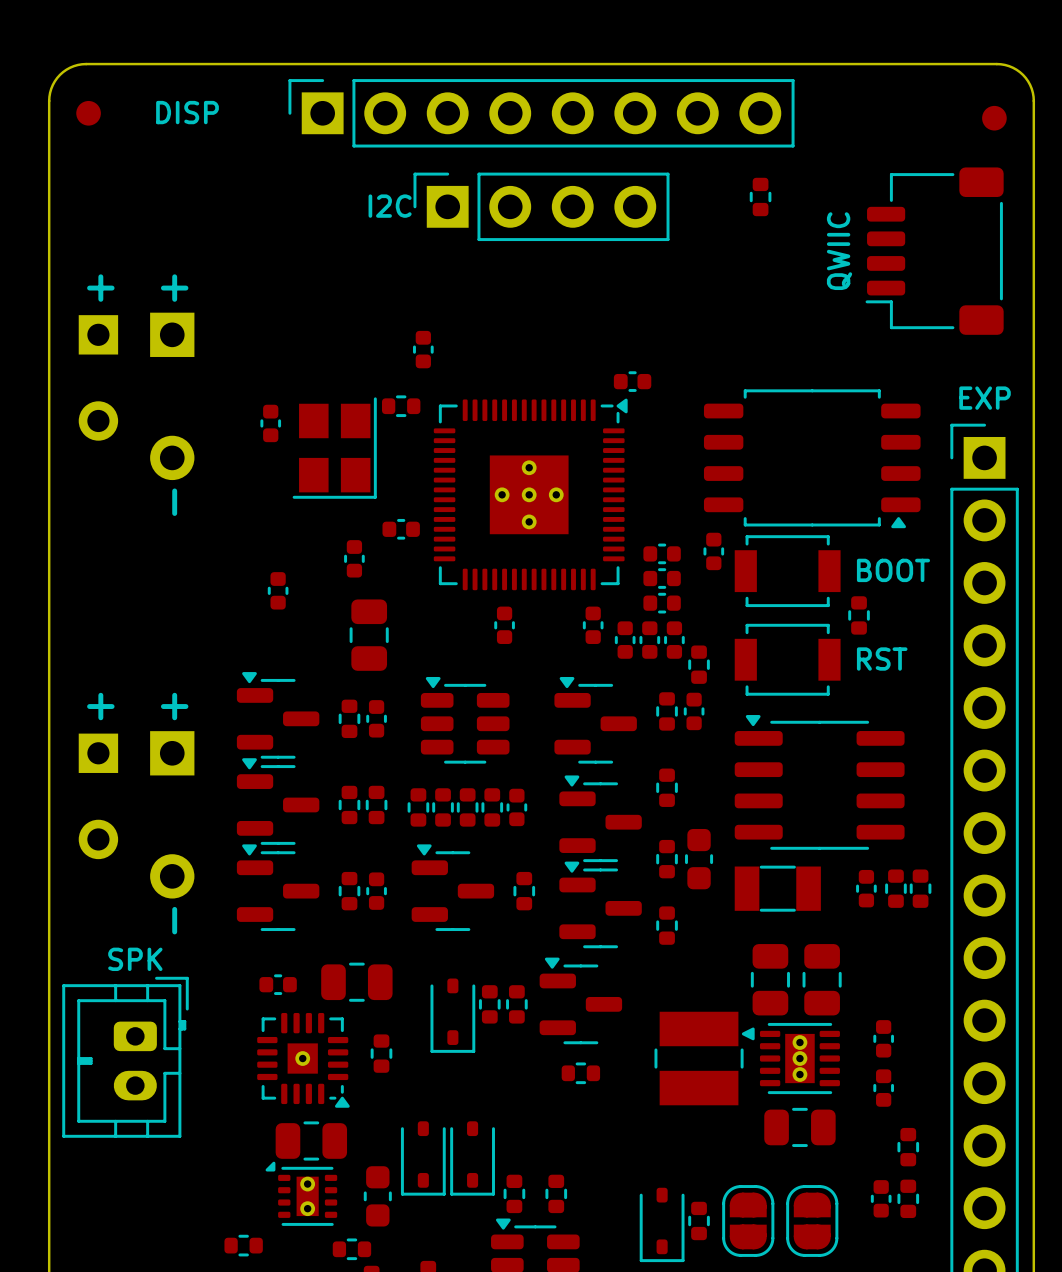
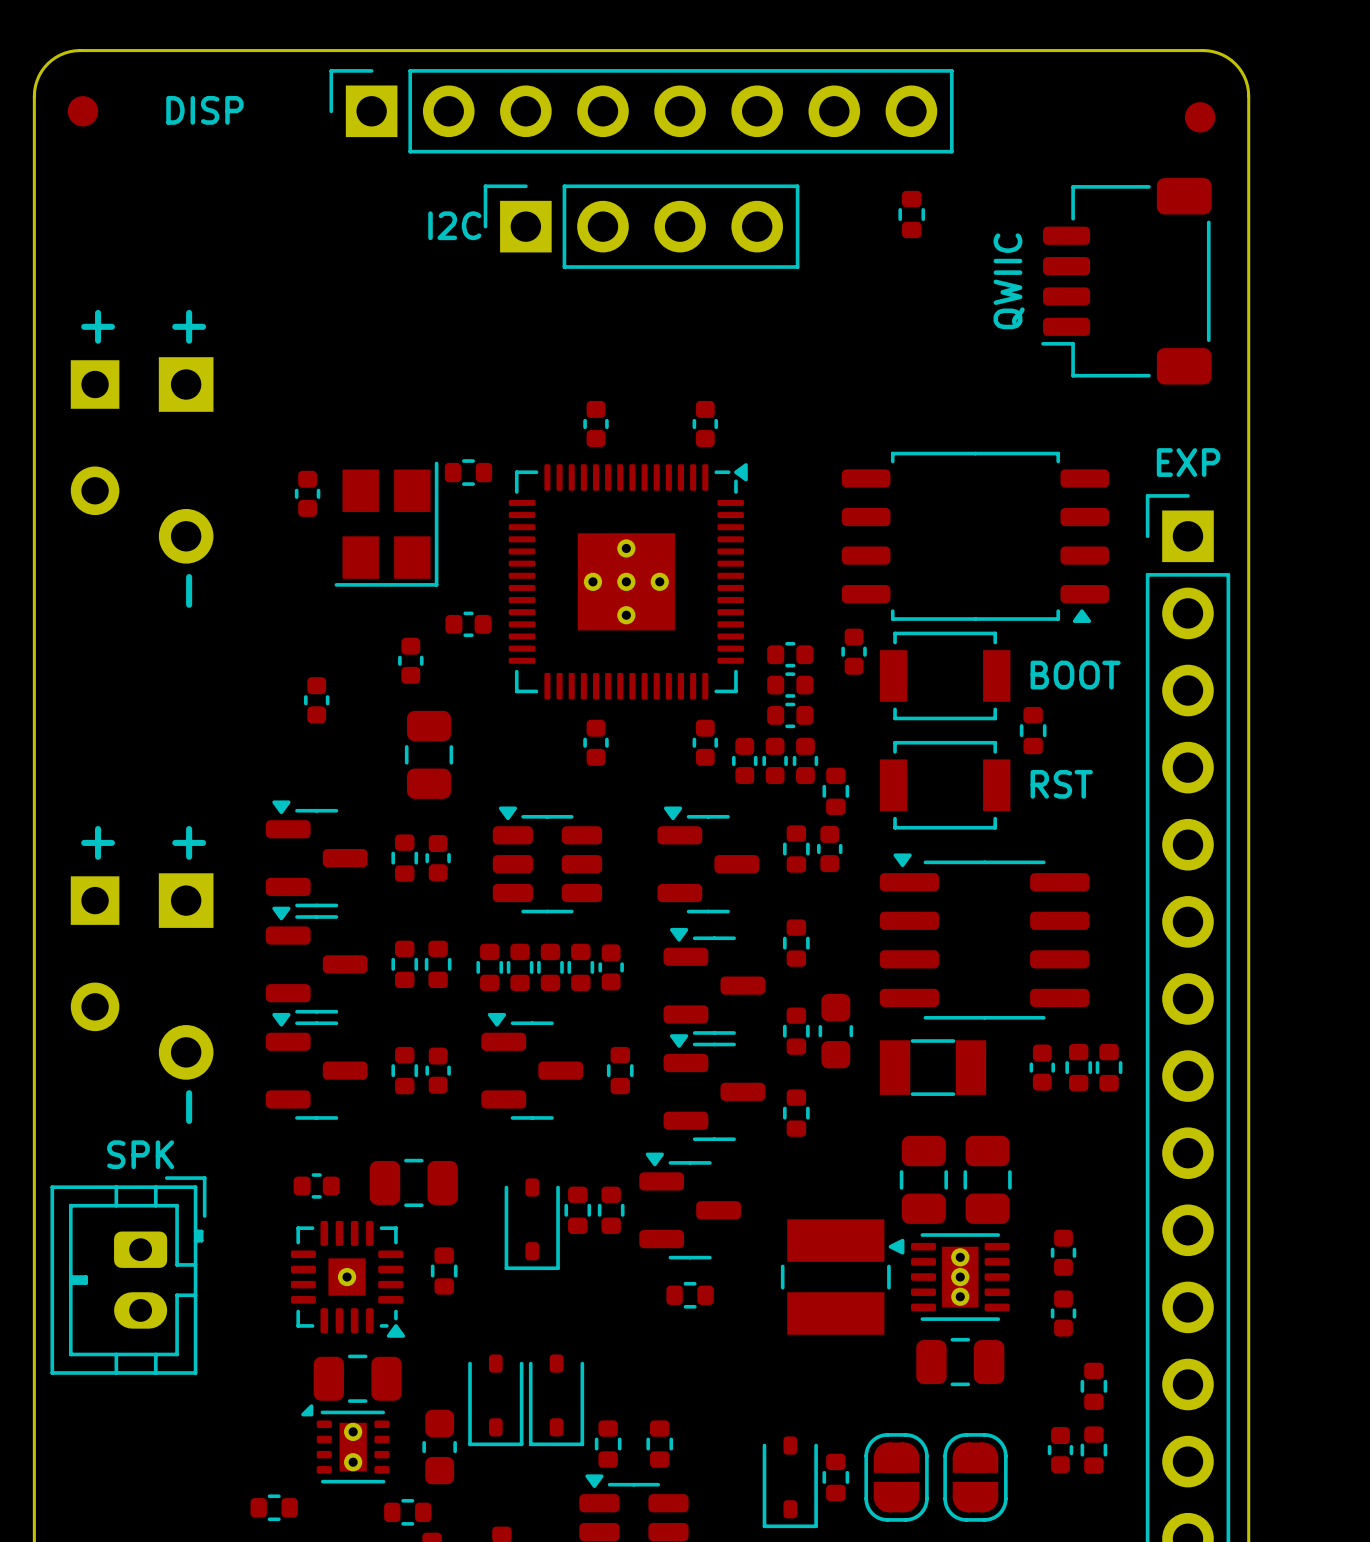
part: (423, 349) -> none
part: none -> (595, 423)
part rotation: 0° (632, 381) -> 90° clockwise (705, 423)
part position: (632, 381) -> (705, 423)

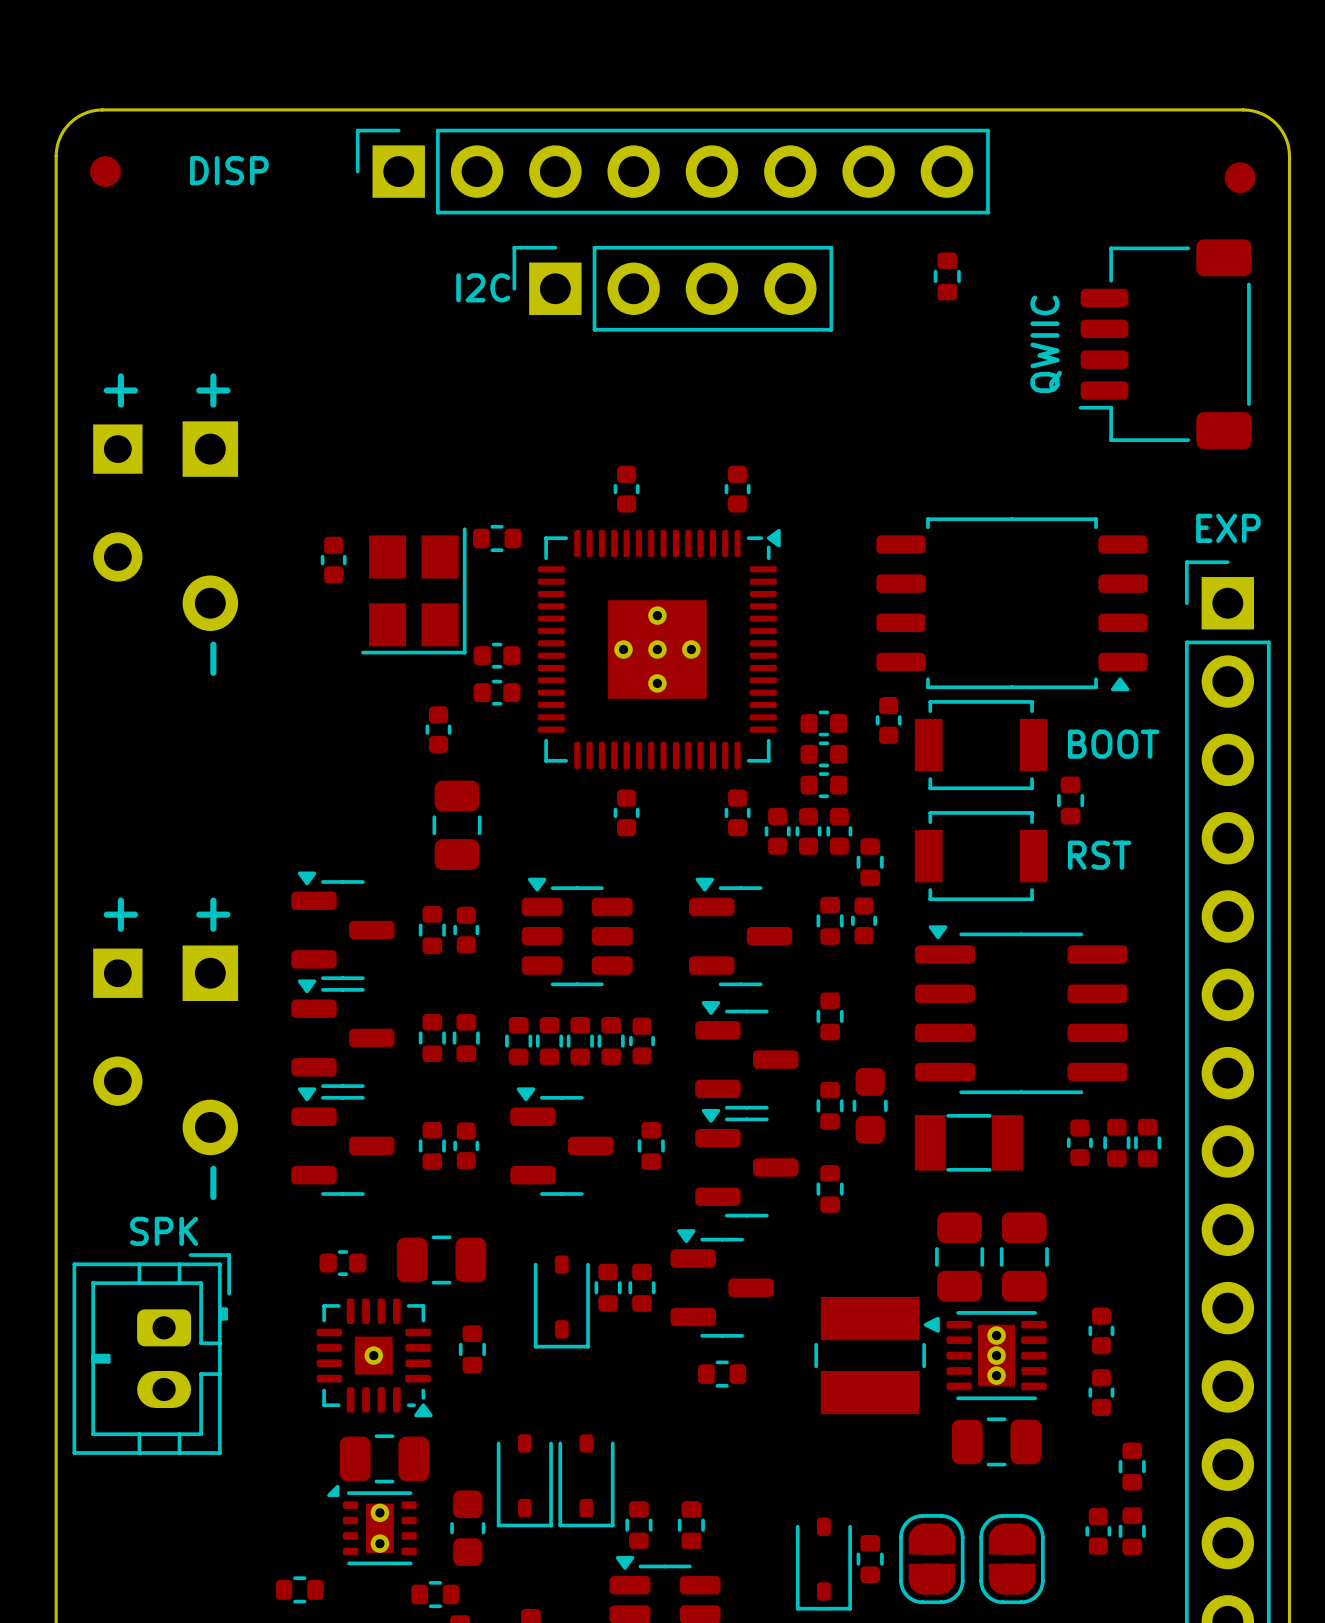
part rotation: 0° (316, 700) -> 90° clockwise (497, 655)
part position: (316, 700) -> (497, 655)

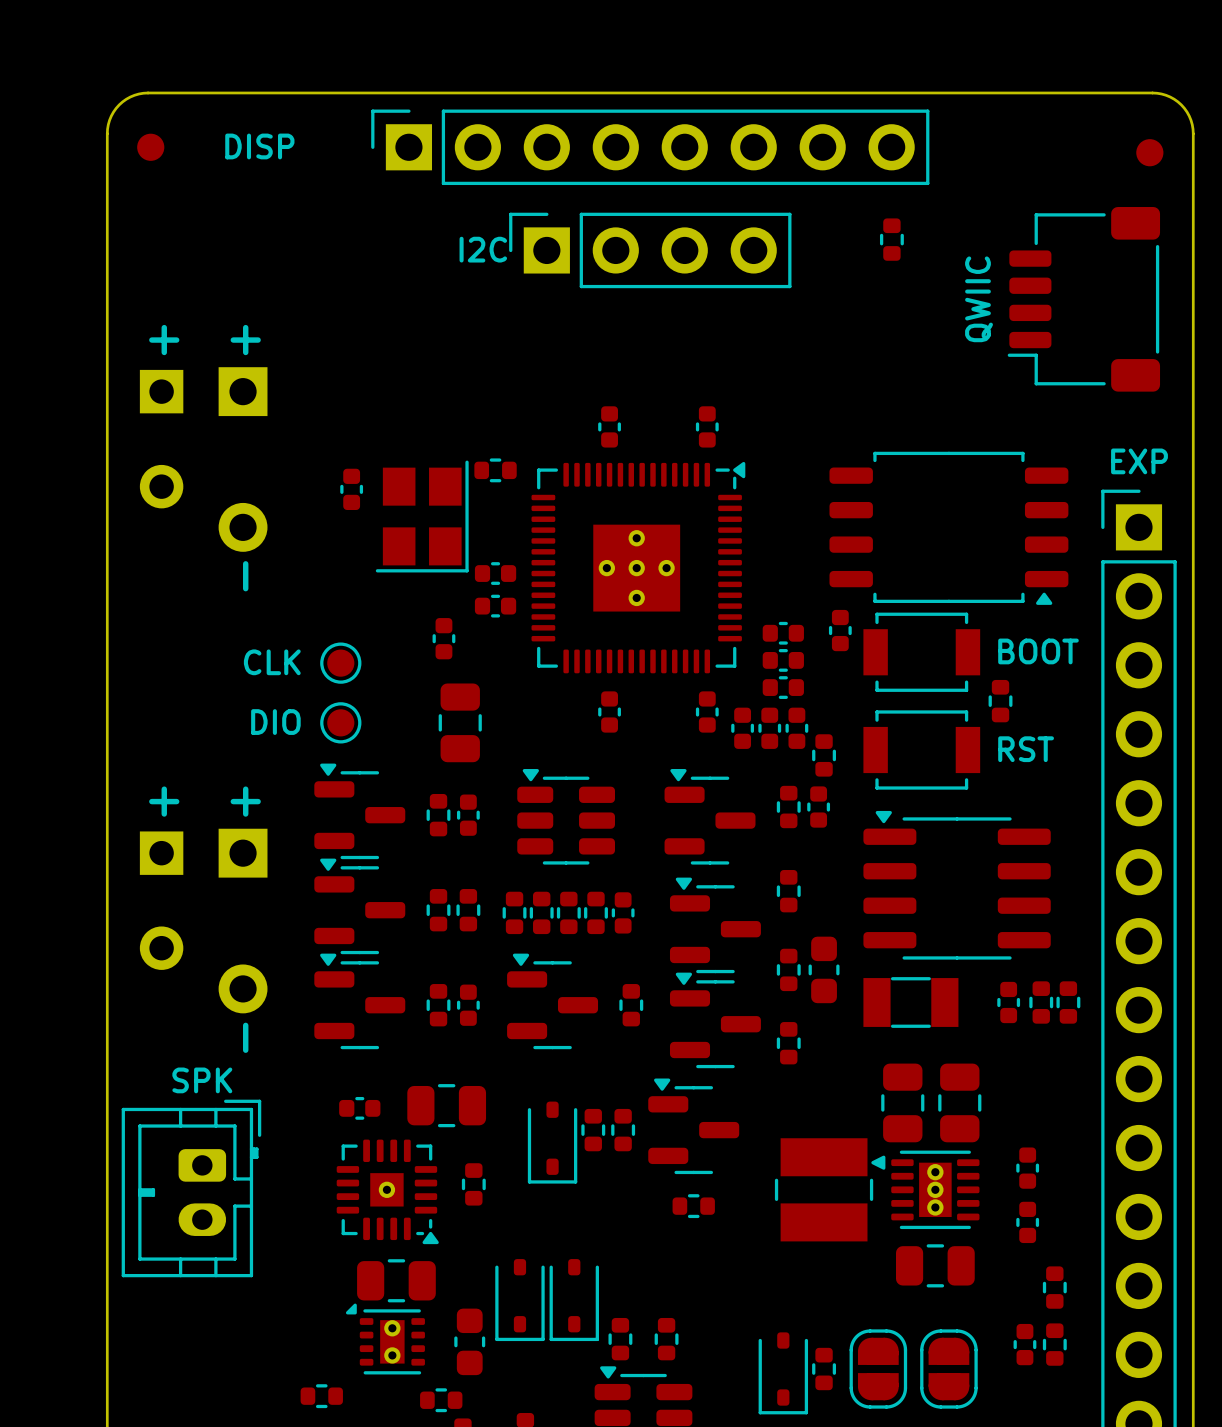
text: none -> CLK (272, 662)
part: none -> (340, 663)
text: none -> DIO (275, 722)
part: none -> (340, 722)

